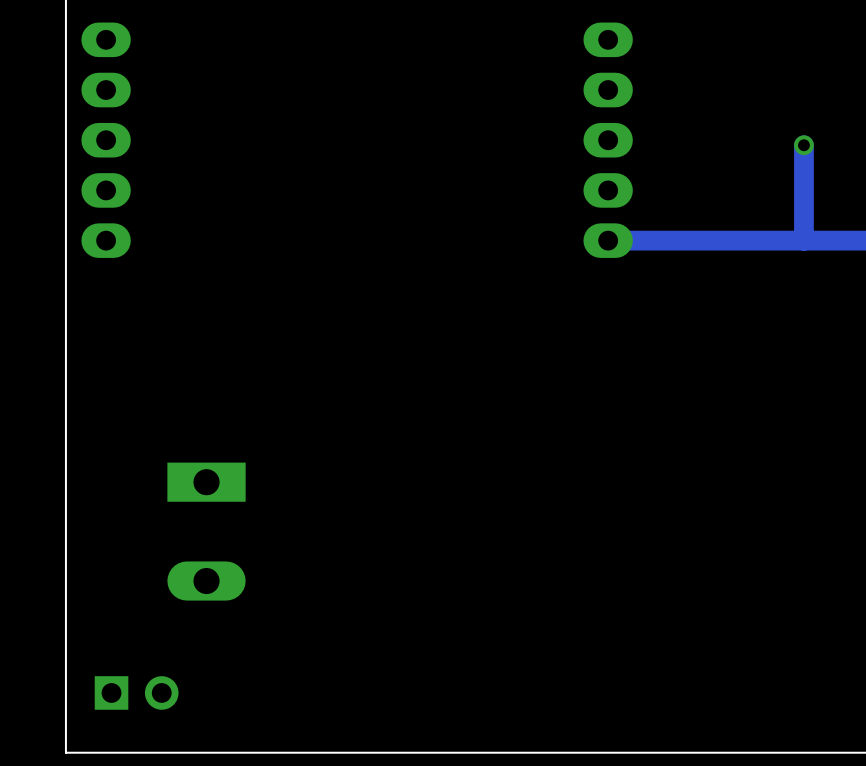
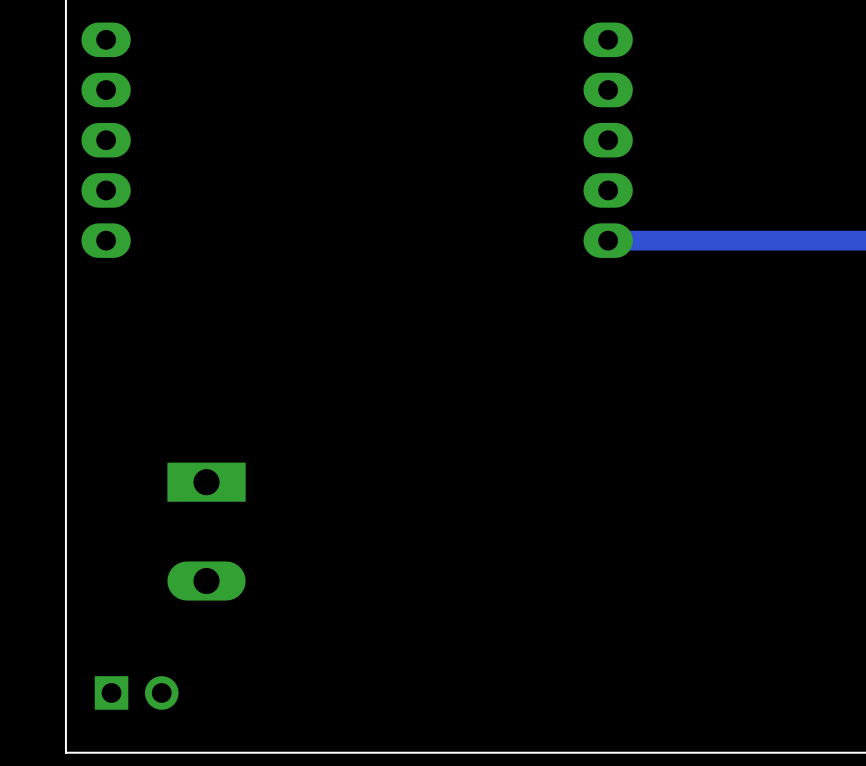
track: (803, 145) (803, 240) -> none
via: (803, 145) -> none

